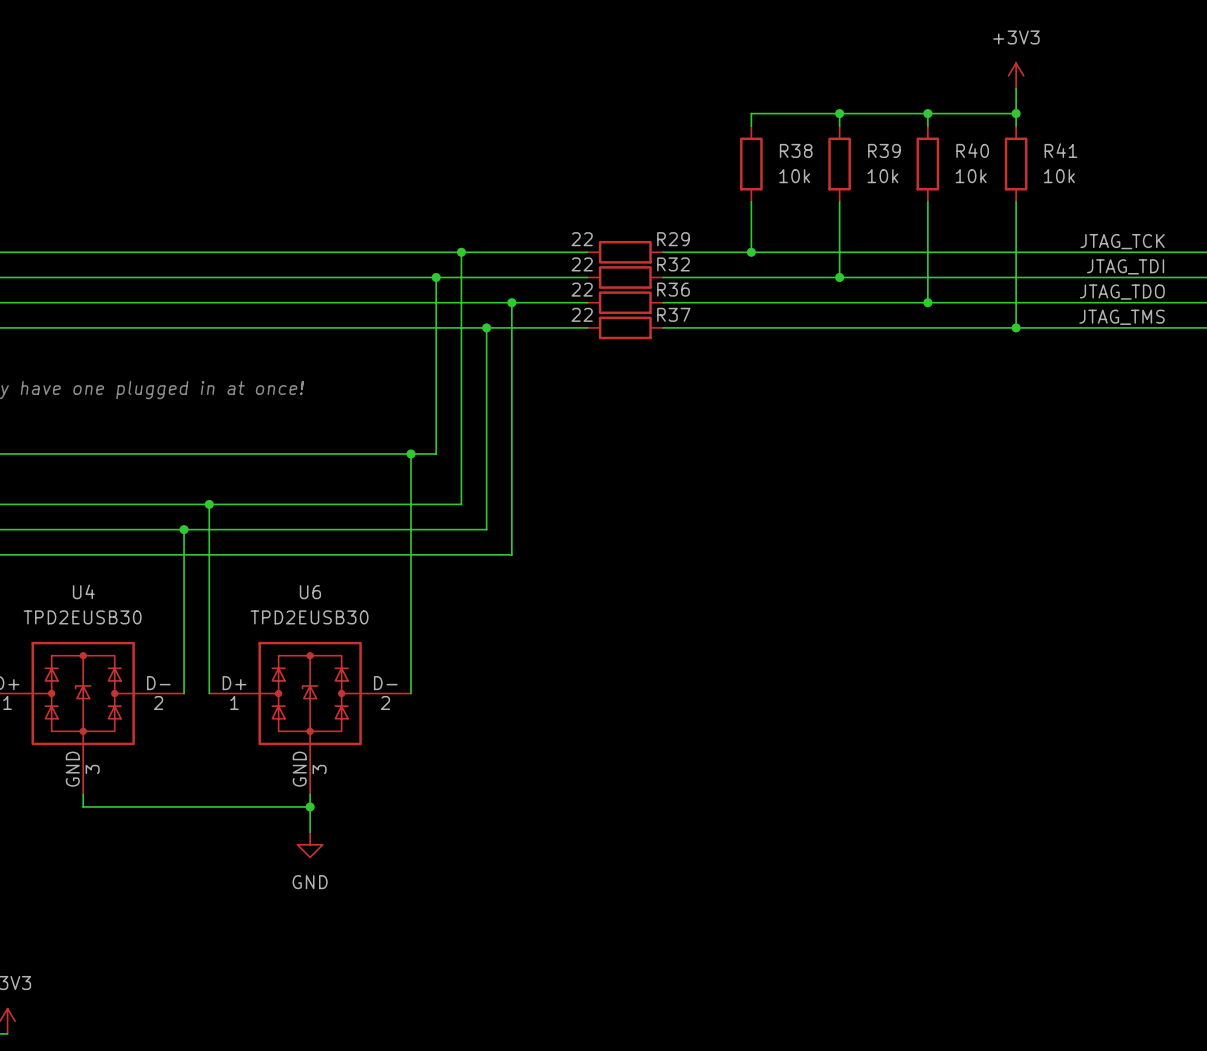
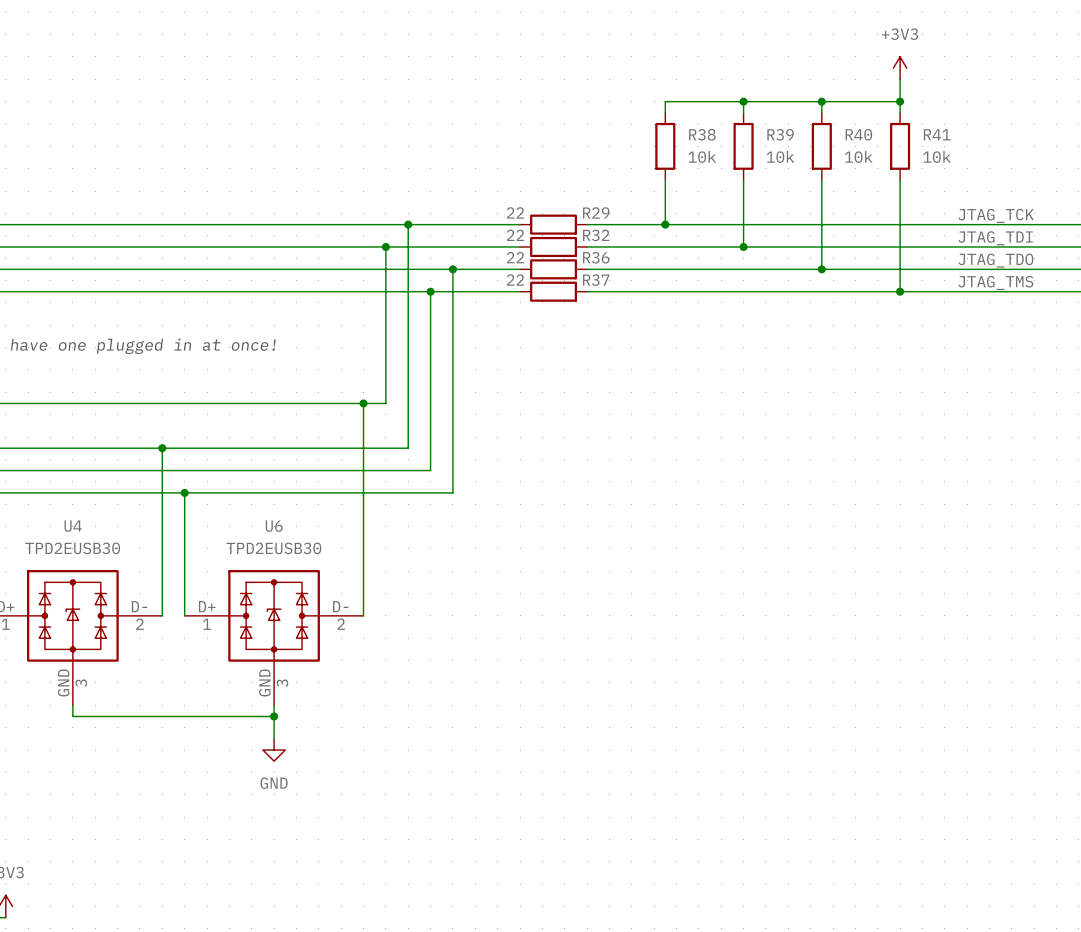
wire: none -> (162, 448) (162, 470)
junction: none -> (162, 448)
wire: (209, 504) (209, 554) -> none
junction: (209, 504) -> none
junction: (184, 529) -> none
junction: none -> (184, 492)

